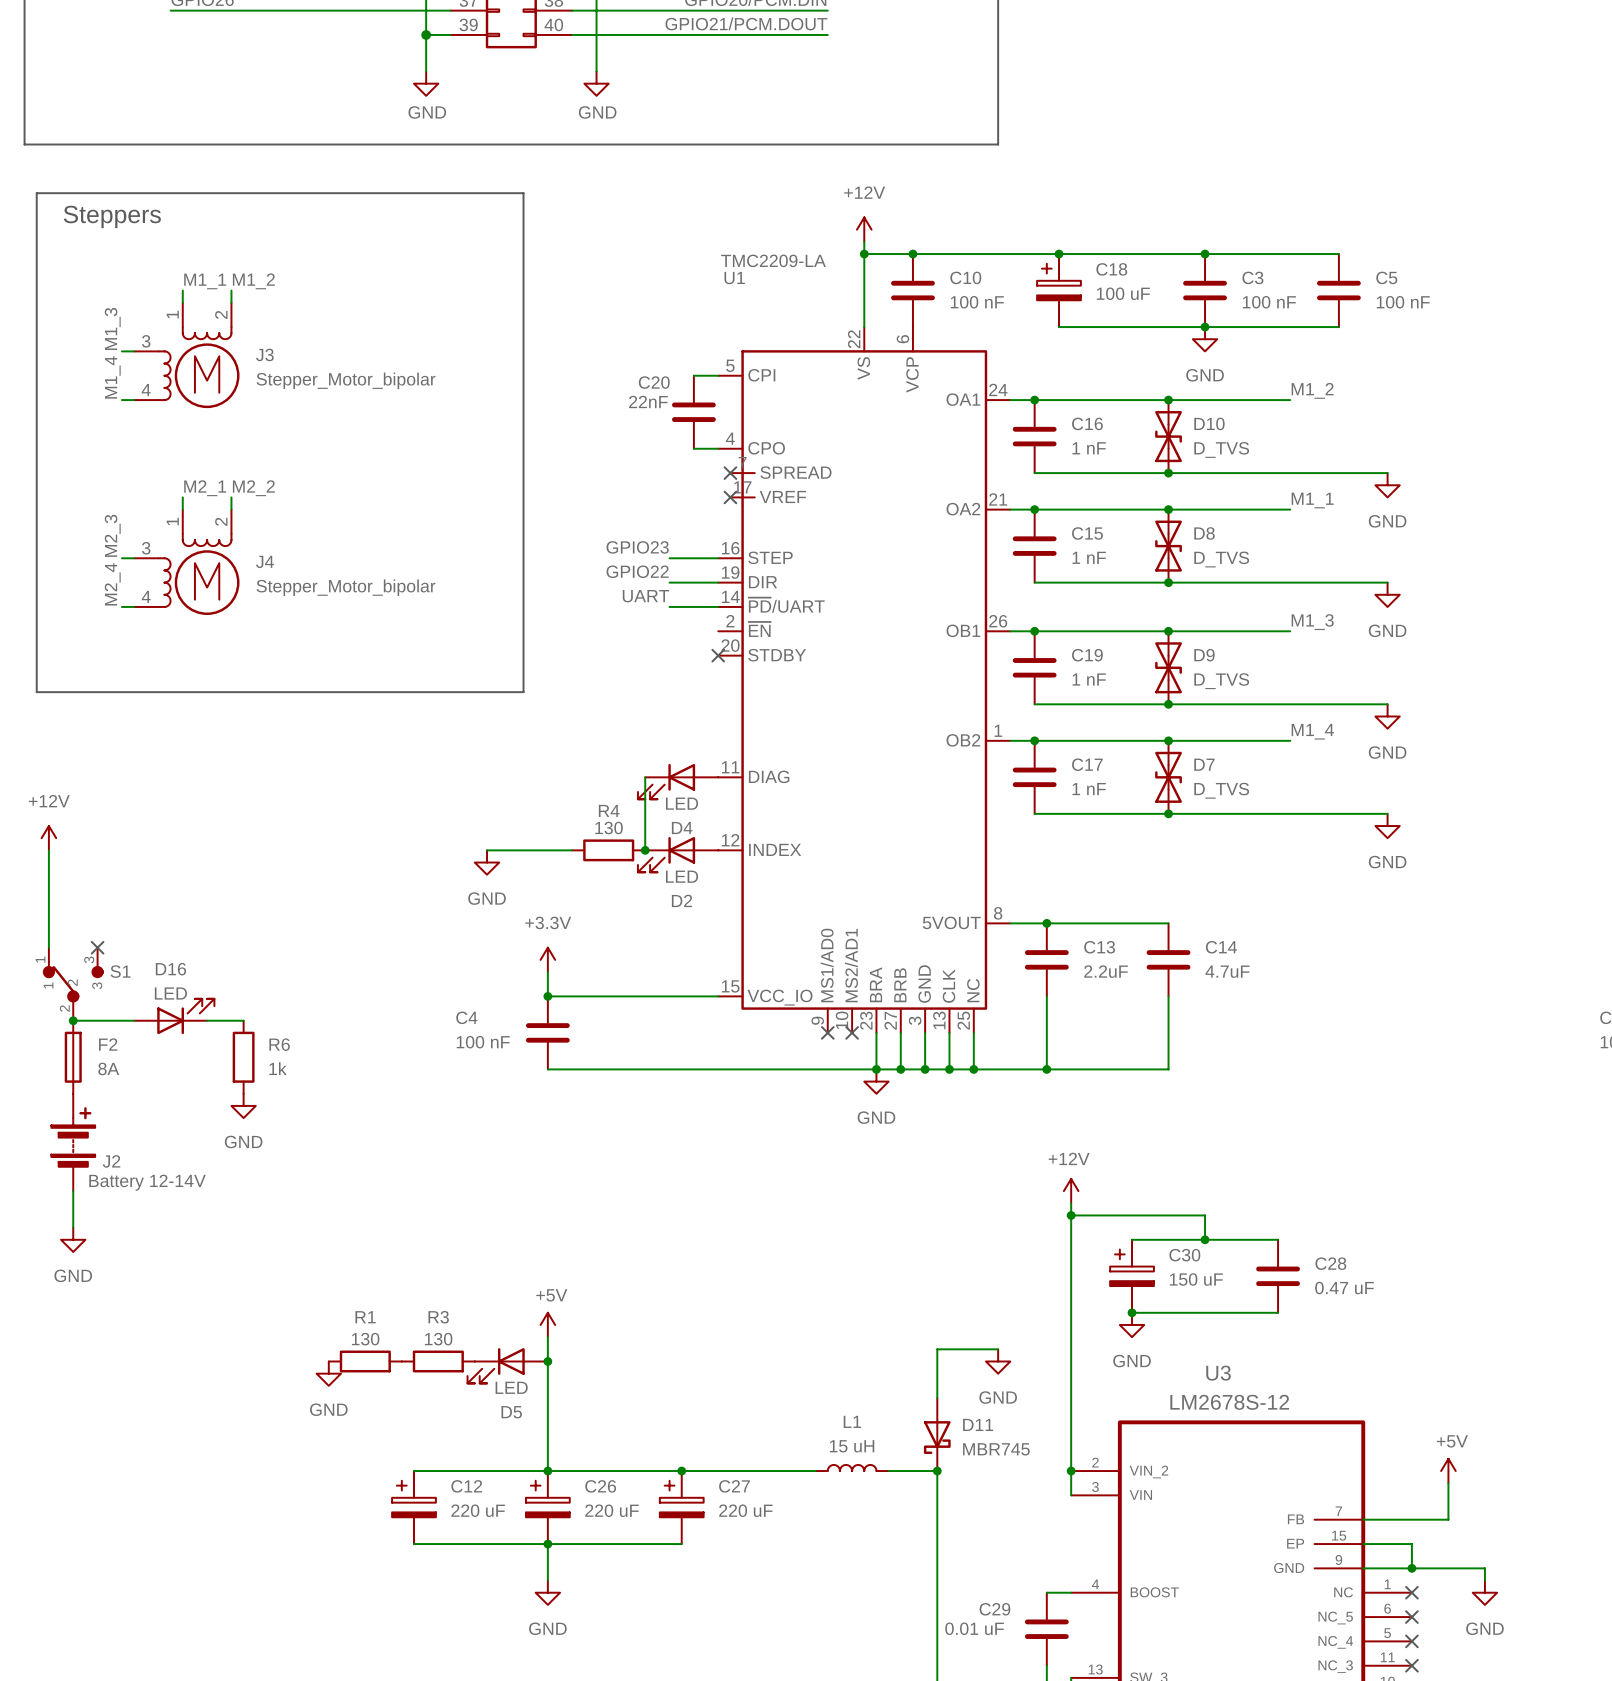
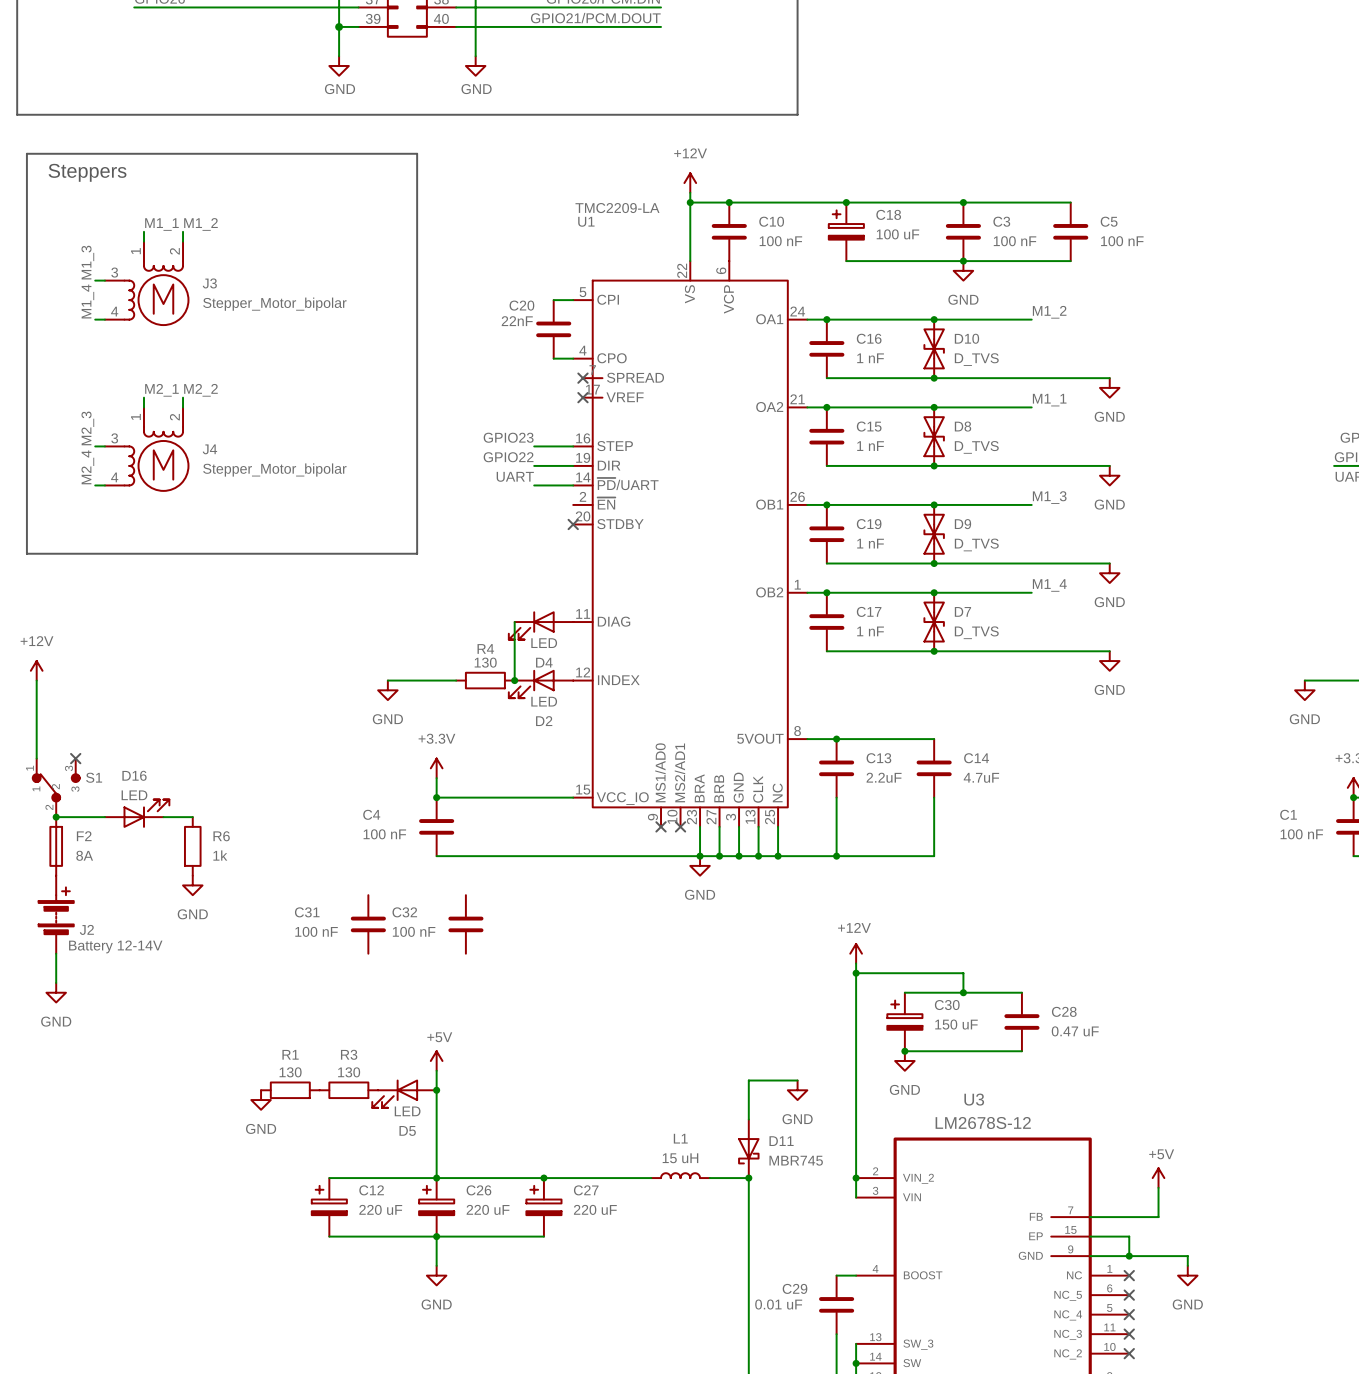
C31: none -> 100 nF (368, 924)
C32: none -> 100 nF (465, 924)

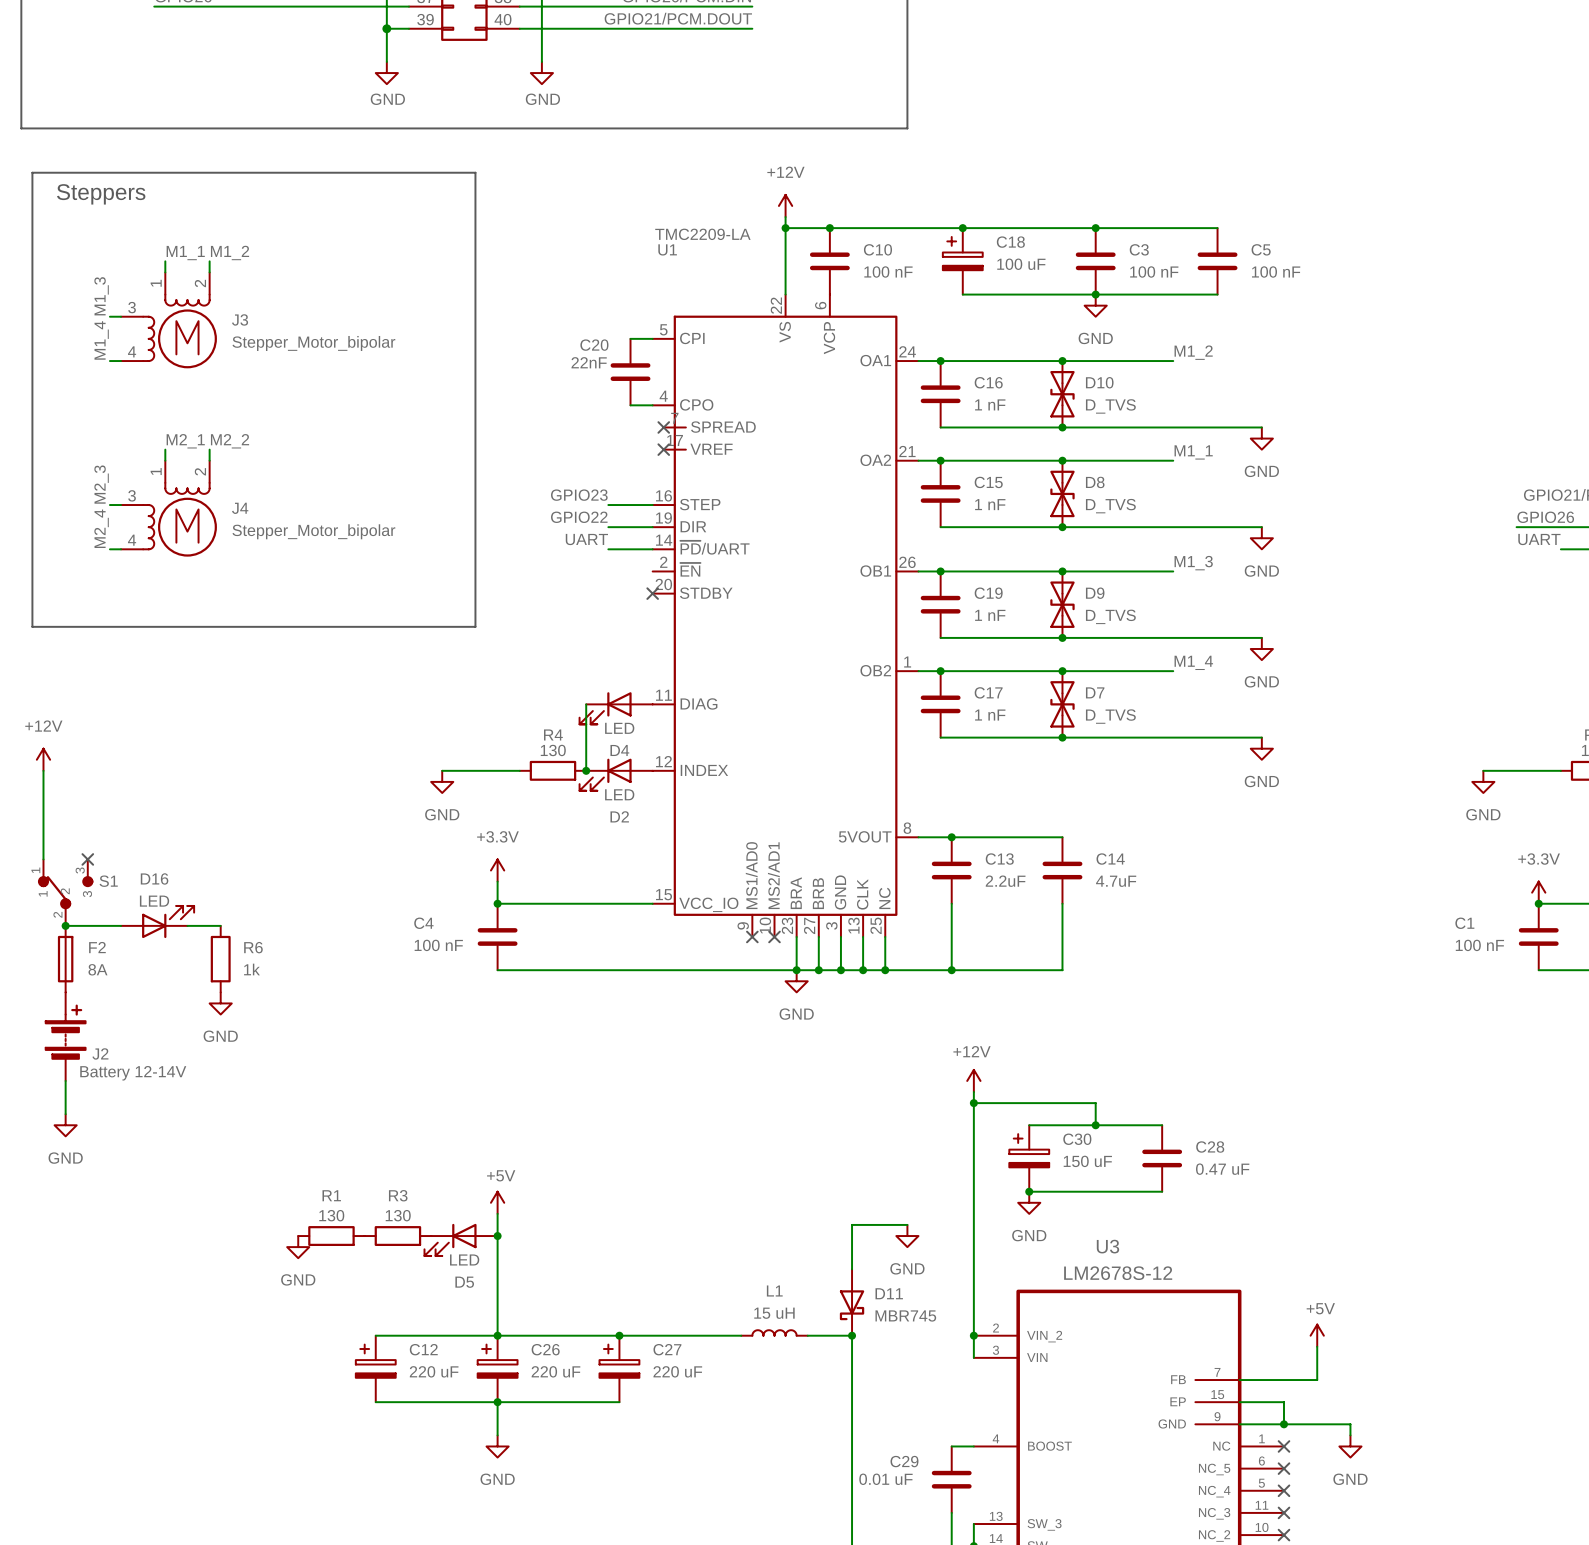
C31: 100 nF (368, 924) -> none
C32: 100 nF (465, 924) -> none

